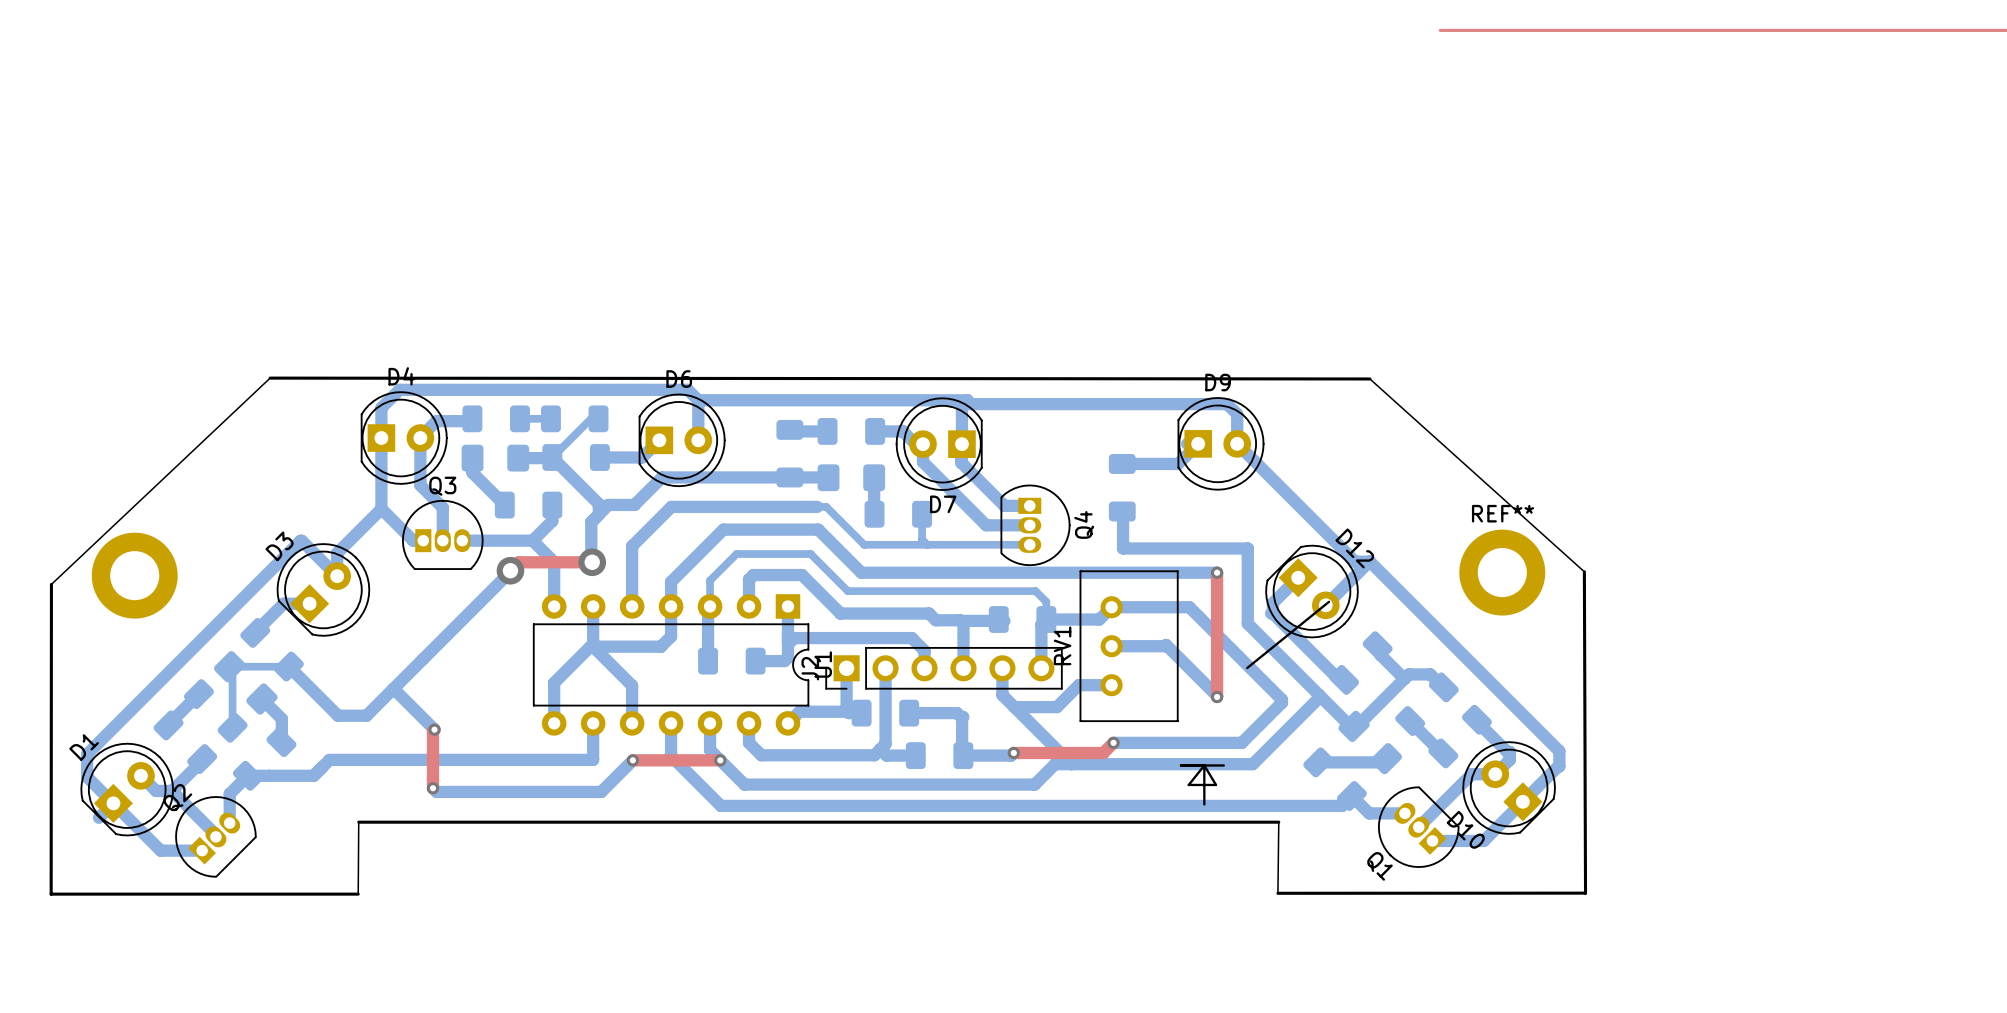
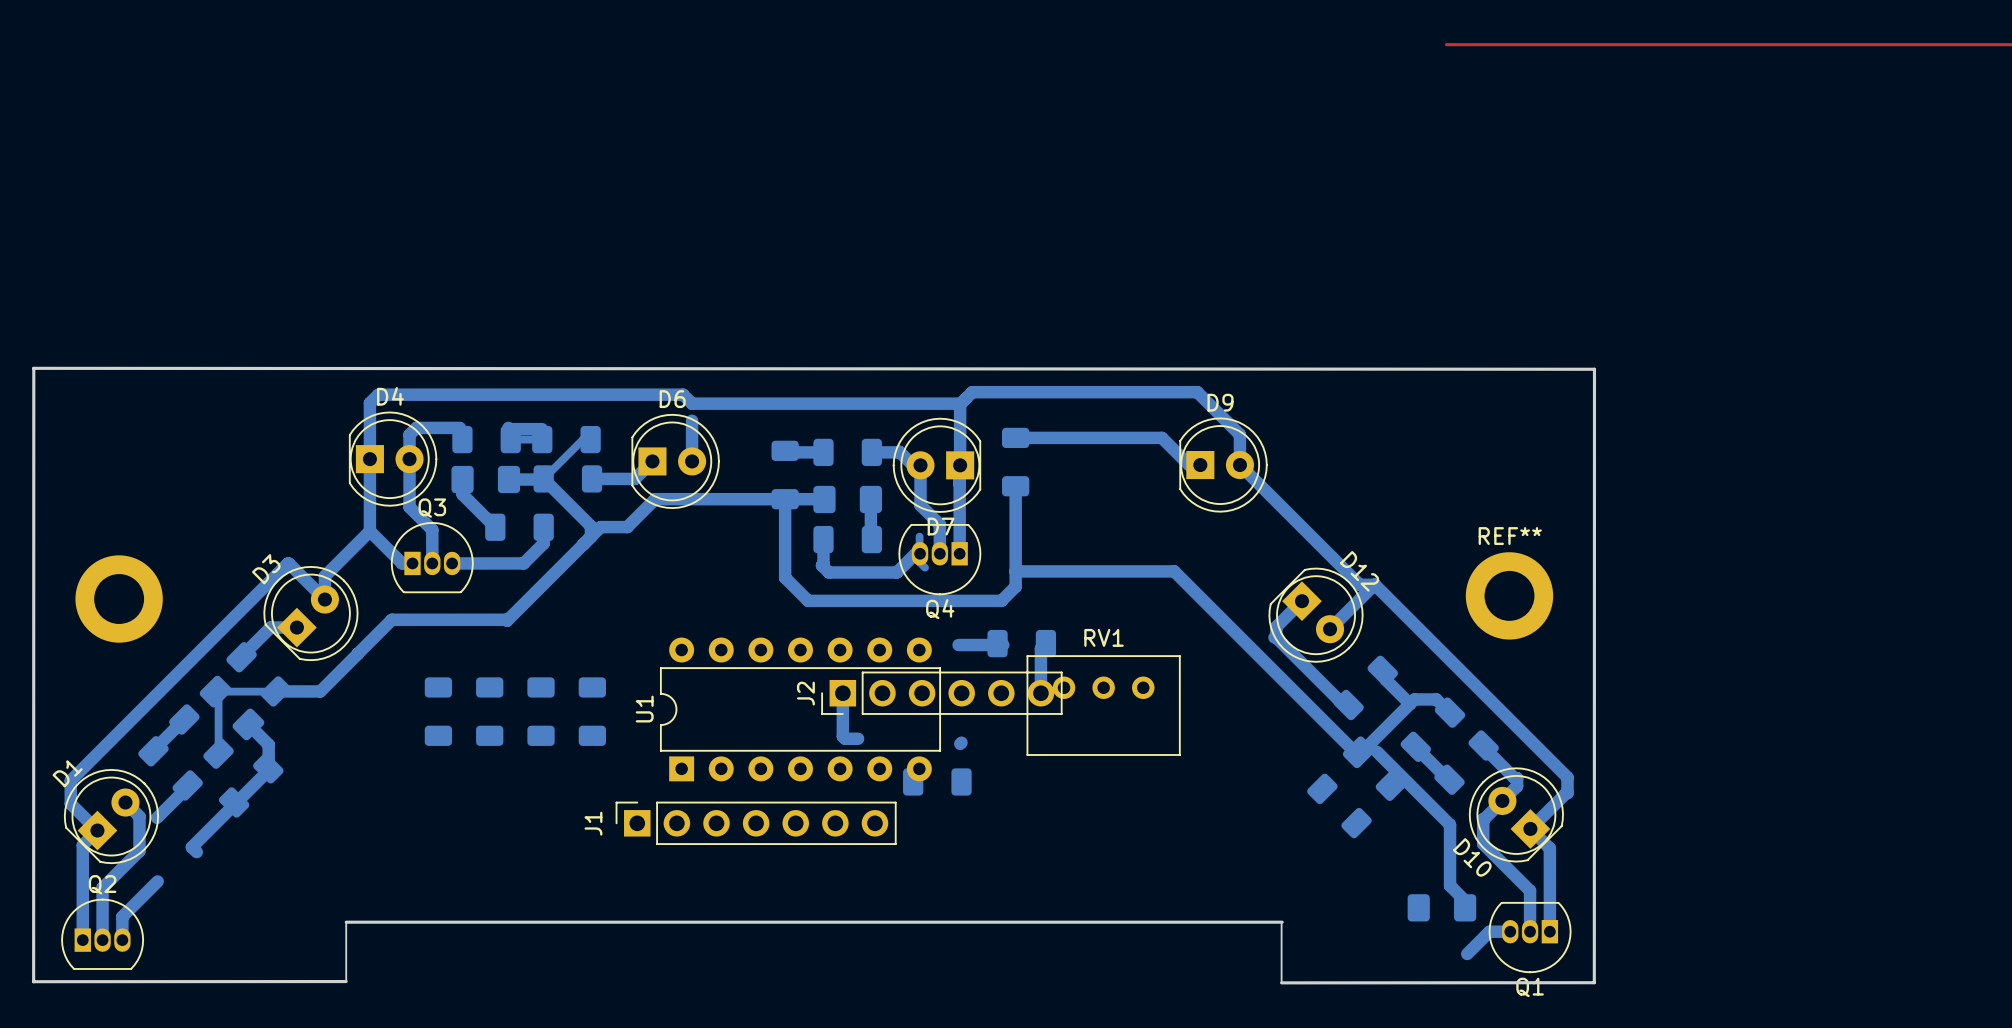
board edge: (270, 378) (51, 584) (51, 894) (358, 894) (358, 822) (1278, 822) (1277, 893) (1585, 893) (1584, 571) (1369, 378) (270, 378) -> none
bottom track: (961, 404) (1227, 404) -> (960, 426) (960, 404) (972, 392) (1197, 392) (1229, 424)
bottom track: (961, 405) (967, 400) (698, 400) (687, 389) (399, 389) (381, 407) -> (960, 403) (692, 403) (683, 394) (378, 394) (369, 403) (369, 428)
bottom track: none -> (508, 427) (542, 429)
bottom track: none -> (1015, 437) (1161, 437) (1189, 465)
bottom track: (470, 421) (436, 421) (420, 437) -> (460, 427) (416, 427) (409, 434) (409, 458)
part: none -> (1015, 462)
bottom track: (1198, 443) (1178, 463) (1122, 463) -> none
bottom track: (922, 462) (986, 525) (1029, 525) -> (920, 483) (920, 505) (939, 524) (941, 555)
bottom track: (961, 462) (1004, 505) (1029, 505) -> (959, 484) (959, 553)
bottom track: none -> (1015, 486) (1015, 586) (1001, 600) (808, 600) (785, 577) (785, 499)
part: (1122, 487) -> none
bottom track: (805, 506) (826, 506) (864, 544) (1029, 544) -> none
bottom track: (817, 506) (671, 506) (632, 546) (632, 606) -> none
bottom track: (1122, 511) (1123, 548) -> (1015, 571) (1123, 571)
part position: (898, 514) -> (847, 539)
bottom track: none -> (823, 539) (821, 565) (828, 572) (896, 572) (915, 553) (920, 553)
bottom track: (591, 522) (592, 562) -> (583, 544) (507, 620) (391, 619) (357, 653)
Q4 rotation: 0° (1035, 525) -> 90° clockwise (939, 559)
Q4 position: (1035, 525) -> (939, 559)
bottom track: (532, 540) (554, 562) (554, 606) -> none
bottom track: (1172, 548) (1247, 548) (1247, 623) -> (1174, 571) (1250, 647)
top track: (592, 562) (518, 562) (510, 570) -> none
via: (592, 562) -> none
bottom track: (510, 570) (366, 715) (338, 715) (288, 666) -> (357, 654) (320, 691) (275, 691)
via: (510, 570) -> none
top track: (1217, 572) (1217, 696) -> none
bottom track: (1217, 572) (861, 572) (818, 529) (723, 529) (671, 581) (671, 636) (660, 646) -> none
via: (1217, 572) -> none
line: (1329, 601) (1247, 668) -> none
bottom track: (593, 606) (593, 646) (632, 685) (632, 723) -> none
bottom track: (749, 606) (749, 579) (753, 575) (802, 575) (840, 613) -> none
bottom track: (787, 606) (787, 657) (784, 661) (755, 661) -> none
bottom track: (840, 613) (929, 613) (935, 620) (959, 620) (963, 623) (963, 668) -> none
bottom track: (787, 644) (794, 638) (911, 638) (924, 650) (924, 668) -> none
bottom track: (660, 646) (590, 646) (554, 682) (554, 723) -> none
bottom track: (1111, 646) (1166, 644) (1217, 696) -> none
RV1 rotation: 0° (1129, 646) -> 90° clockwise (1103, 705)
bottom track: (710, 659) (708, 661) (710, 580) (736, 554) (810, 554) (847, 591) (1035, 591) (1046, 601) (1046, 619) (1099, 619) (1111, 607) (1189, 607) (1281, 699) (1281, 702) (1241, 742) (1113, 742) -> none
part: (731, 661) -> none
U1 rotation: 0° (671, 664) -> 180° (800, 709)
bottom track: (885, 668) (885, 744) (874, 755) (761, 755) (749, 742) (749, 723) -> none
bottom track: (1002, 668) (1002, 695) (1071, 764) -> none
bottom track: (1111, 685) (1078, 685) (1056, 707) (1014, 707) -> none
part: none -> (438, 711)
part: none -> (489, 711)
part: none -> (541, 711)
part: none -> (592, 711)
bottom track: (393, 689) (434, 729) -> none
bottom track: (1318, 694) (1318, 698) (1252, 764) (1055, 764) (1034, 784) (744, 784) (710, 750) (710, 723) -> none
via: (1217, 696) -> none
bottom track: (847, 711) (799, 711) (787, 723) -> none
part: (885, 713) -> none
bottom track: (909, 713) (957, 713) (962, 718) (962, 755) -> none
bottom track: (593, 723) (593, 759) -> none
bottom track: (671, 723) (670, 755) (720, 805) (1342, 805) (1351, 796) (1369, 813) (1404, 813) -> none
bottom track: none -> (1377, 751) (1450, 824) (1450, 885) (1465, 901)
top track: (434, 729) (432, 788) -> none
via: (434, 729) -> none
top track: (1113, 742) (1103, 752) (1013, 752) -> none
via: (1113, 742) -> none
bottom track: none -> (268, 770) (191, 847) (196, 852)
bottom track: (880, 749) (886, 755) (915, 755) -> none
bottom track: (1013, 752) (1011, 755) (963, 755) -> none
via: (1013, 752) -> none
bottom track: (1386, 758) (1382, 762) (1318, 762) -> none
bottom track: (592, 759) (329, 759) (313, 775) (247, 775) (229, 793) (229, 823) -> none
top track: (632, 760) (720, 760) -> none
bottom track: (632, 760) (601, 791) (436, 791) (432, 788) -> none
via: (632, 760) -> none
via: (720, 760) -> none
line: (1180, 765) (1223, 765) -> none
line: (1204, 765) (1188, 784) (1216, 784) (1204, 765) -> none
line: (1204, 765) (1204, 804) -> none
bottom track: (1495, 774) (1471, 774) (1418, 827) -> (1502, 800) (1483, 819) (1483, 844) (1530, 890) (1530, 931)
via: (432, 788) -> none
bottom track: (154, 789) (172, 790) (215, 836) -> (139, 816) (139, 850) (102, 887) (102, 940)
J1: none -> (756, 823)
bottom track: (1522, 801) (1483, 840) (1432, 840) -> (1530, 828) (1549, 848) (1549, 931)
bottom track: (113, 803) (160, 850) (202, 850) -> none
bottom track: none -> (82, 845) (82, 940)
Q1 rotation: 0° (1418, 827) -> 45° counterclockwise (1530, 937)
Q1 position: (1418, 827) -> (1530, 937)
Q2 rotation: 0° (215, 836) -> 45° clockwise (102, 934)
Q2 position: (215, 836) -> (102, 934)
bottom track: none -> (157, 881) (122, 916) (122, 940)
part: none -> (1441, 907)
board edge: none -> (1281, 922) (1281, 982) (1594, 982) (1594, 369) (33, 368) (33, 981)
board edge: none -> (1282, 922) (346, 922) (346, 981)
bottom track: none -> (1510, 931) (1489, 931) (1467, 954)
board edge: none -> (346, 981) (33, 981)

